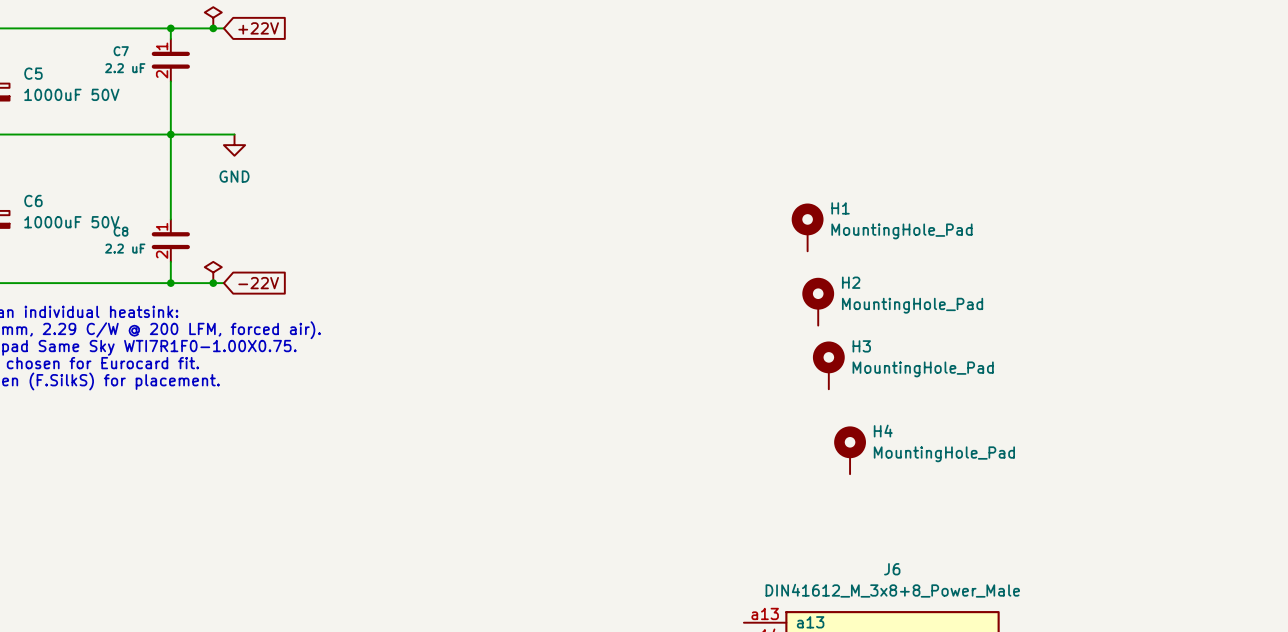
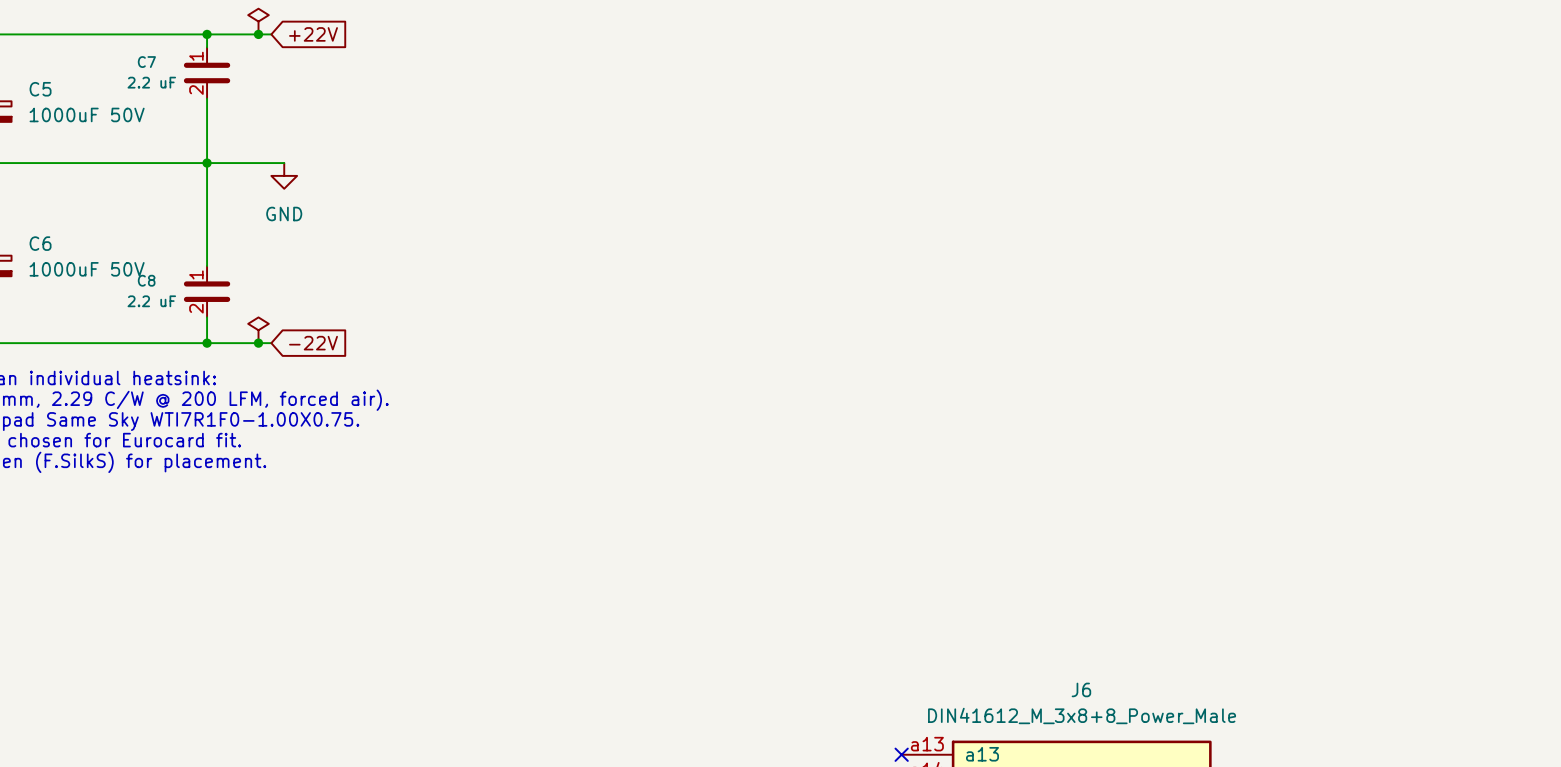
H1: MountingHole_Pad (807, 227) -> none
H2: MountingHole_Pad (818, 301) -> none
H3: MountingHole_Pad (828, 365) -> none
H4: MountingHole_Pad (850, 450) -> none
no-connect mark: none -> (901, 754)

